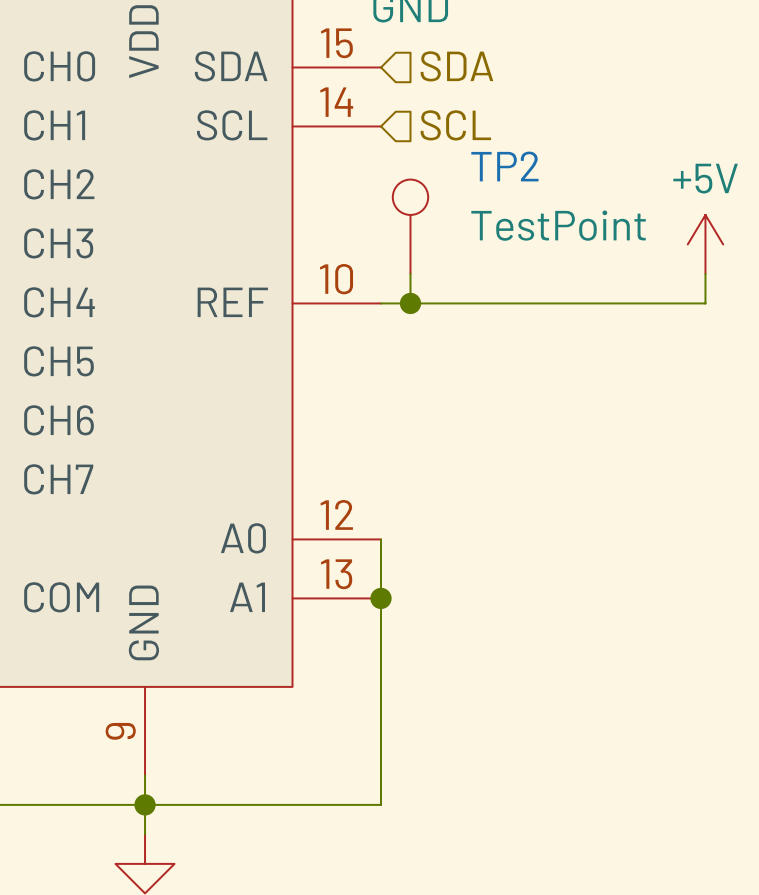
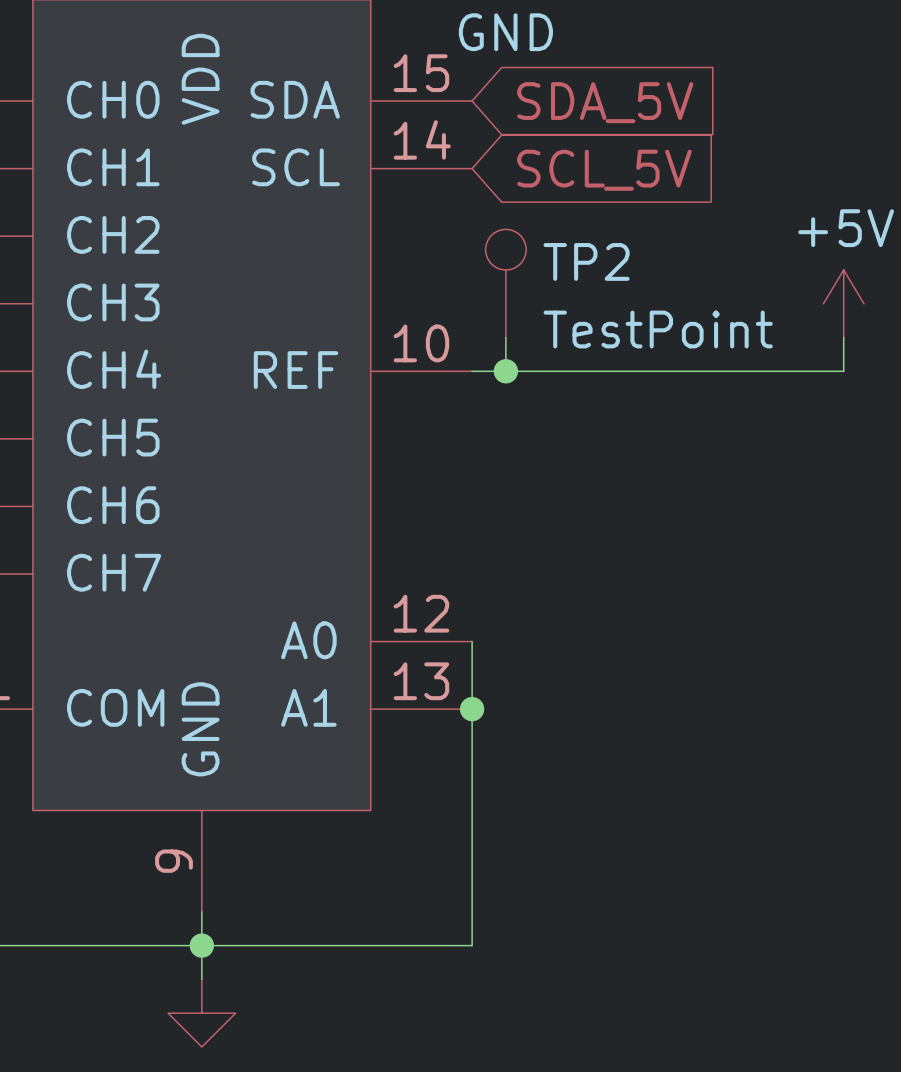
hierarchical label: SDA (456, 66) -> none
global label: none -> SDA_5V (605, 102)
hierarchical label: SCL (455, 125) -> none
global label: none -> SCL_5V (604, 170)
TP2 name position: TP2 (504, 166) -> TP2 (586, 261)
TP2 value position: TestPoint (558, 225) -> TestPoint (658, 329)

